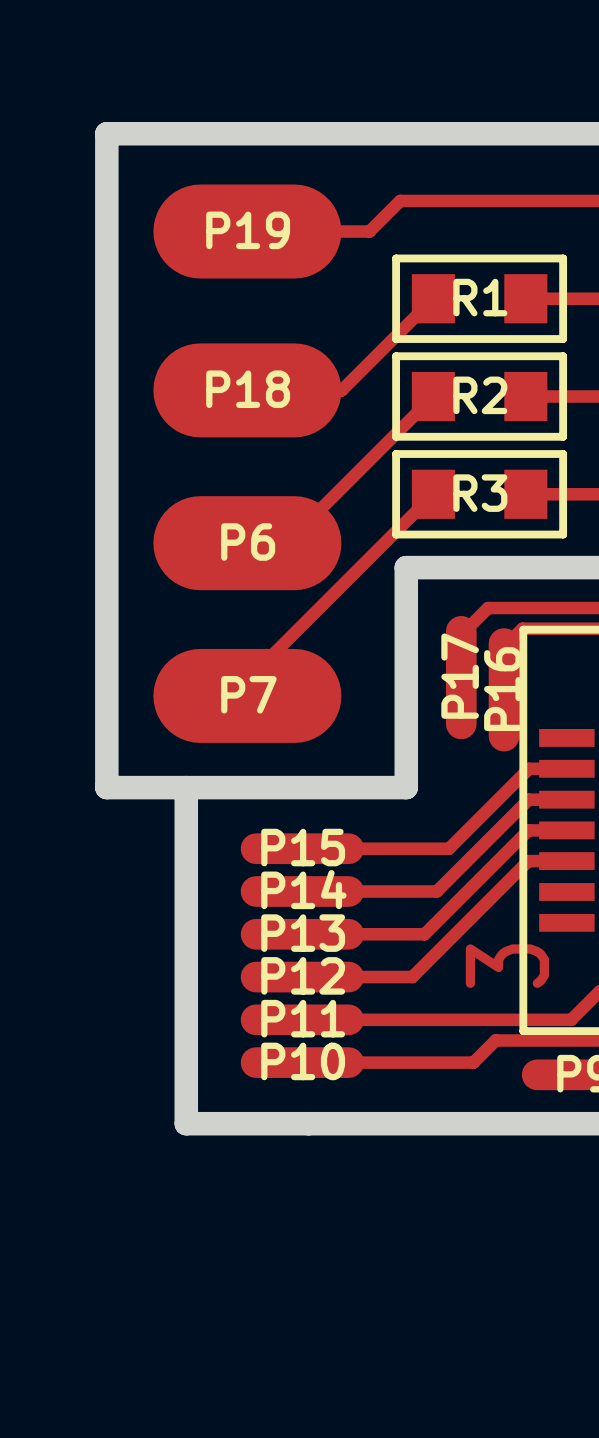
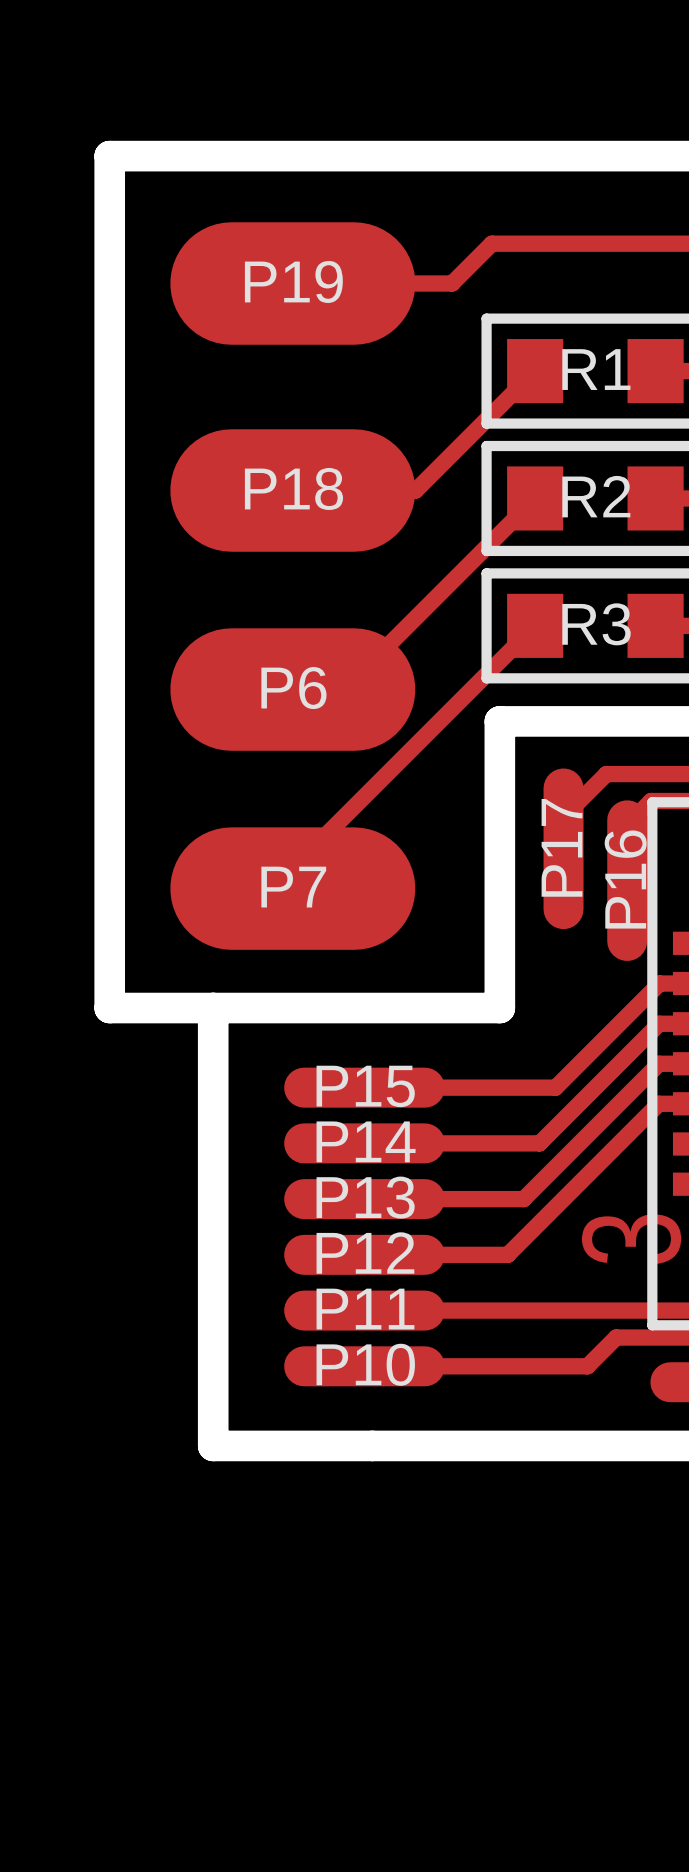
P17 position: (461, 677) -> (563, 848)

